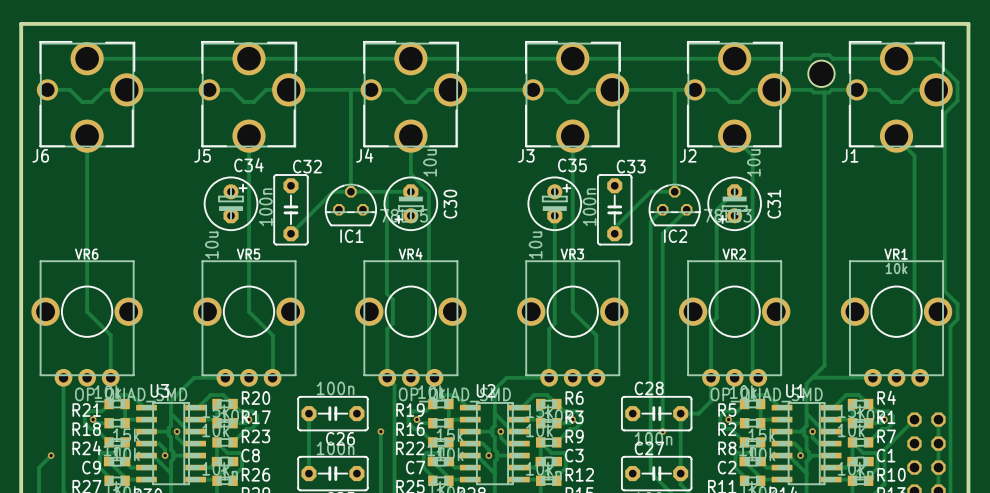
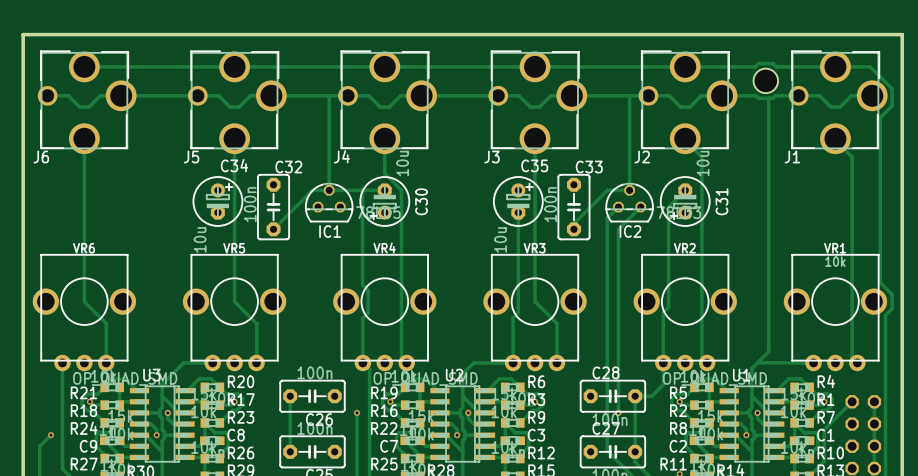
VR6 footprint: [31, 260, 143, 387] -> [32, 253, 137, 372]
VR5 footprint: [193, 260, 305, 387] -> [182, 253, 287, 372]
VR4 footprint: [355, 260, 467, 387] -> [333, 253, 437, 372]
VR3 footprint: [517, 260, 629, 387] -> [483, 253, 587, 372]
VR2 footprint: [678, 260, 791, 387] -> [633, 253, 737, 372]
VR1 footprint: [840, 260, 953, 387] -> [783, 253, 888, 372]

